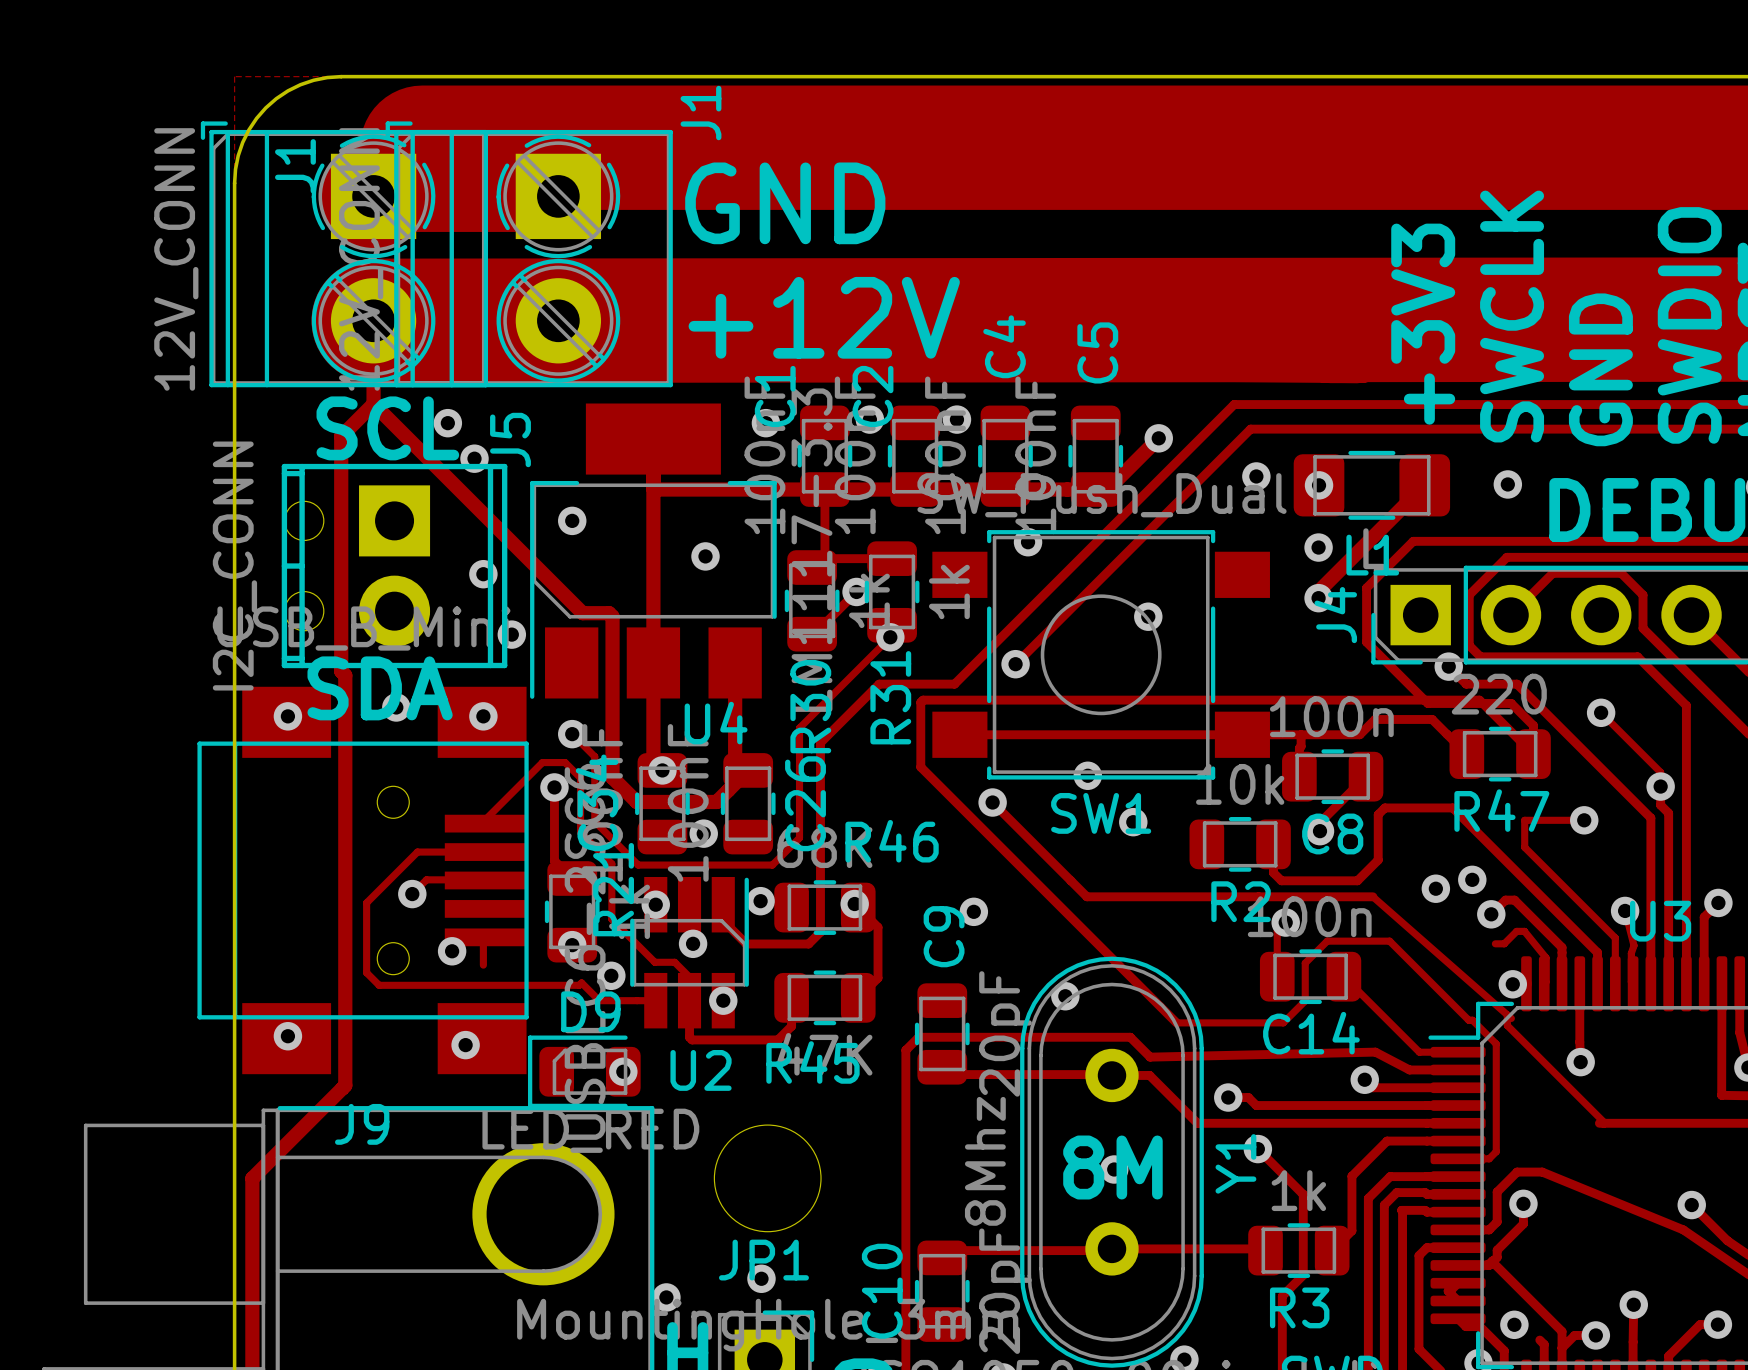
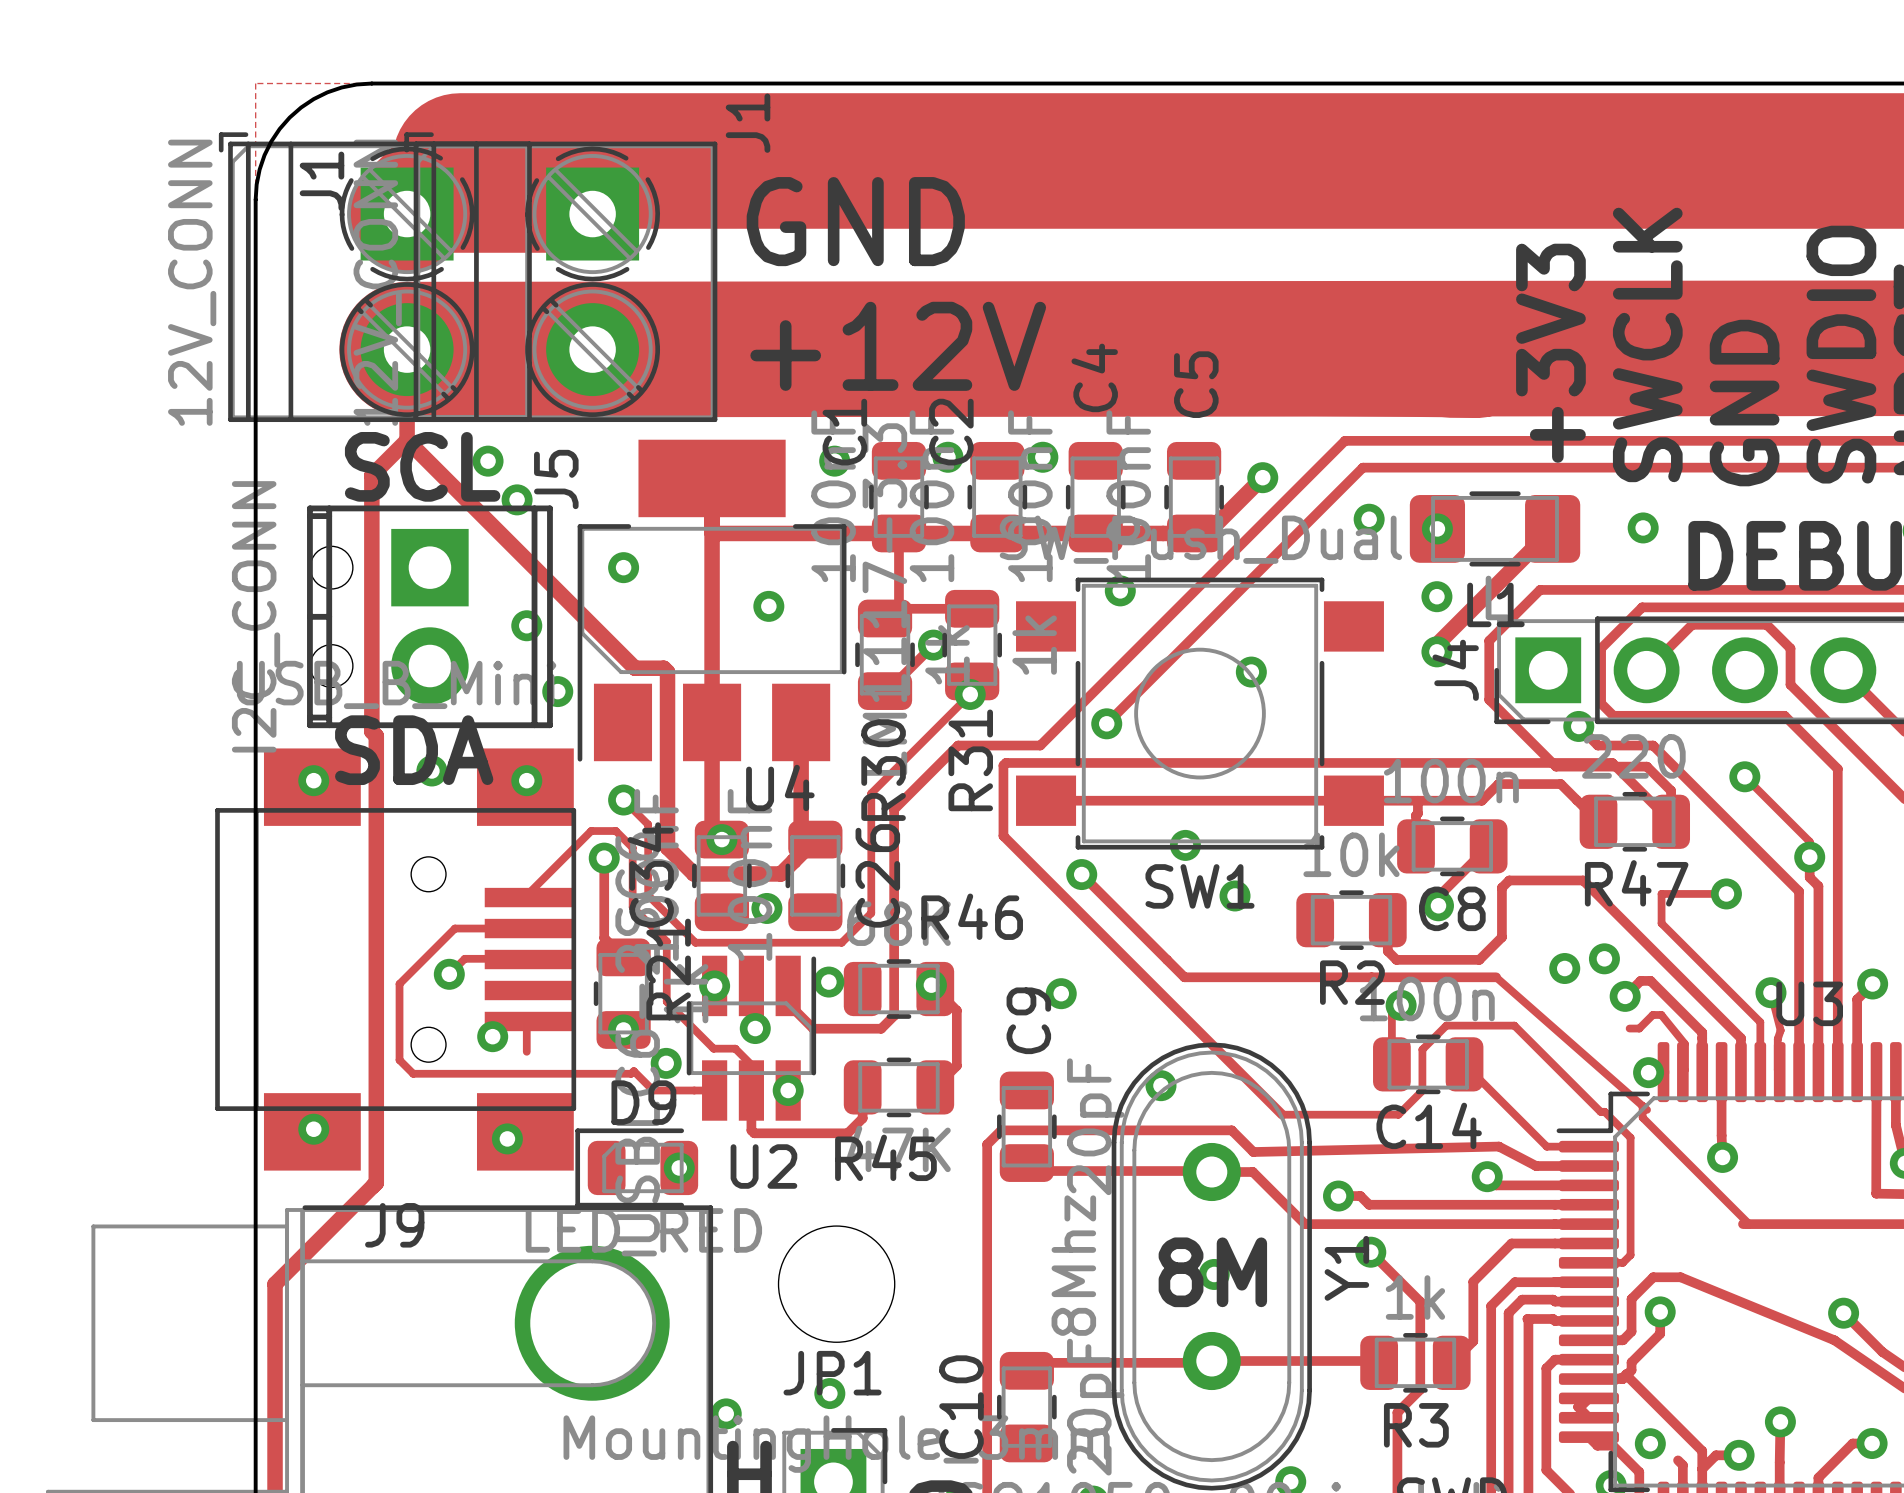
J1 position: (529, 254) -> (560, 277)

